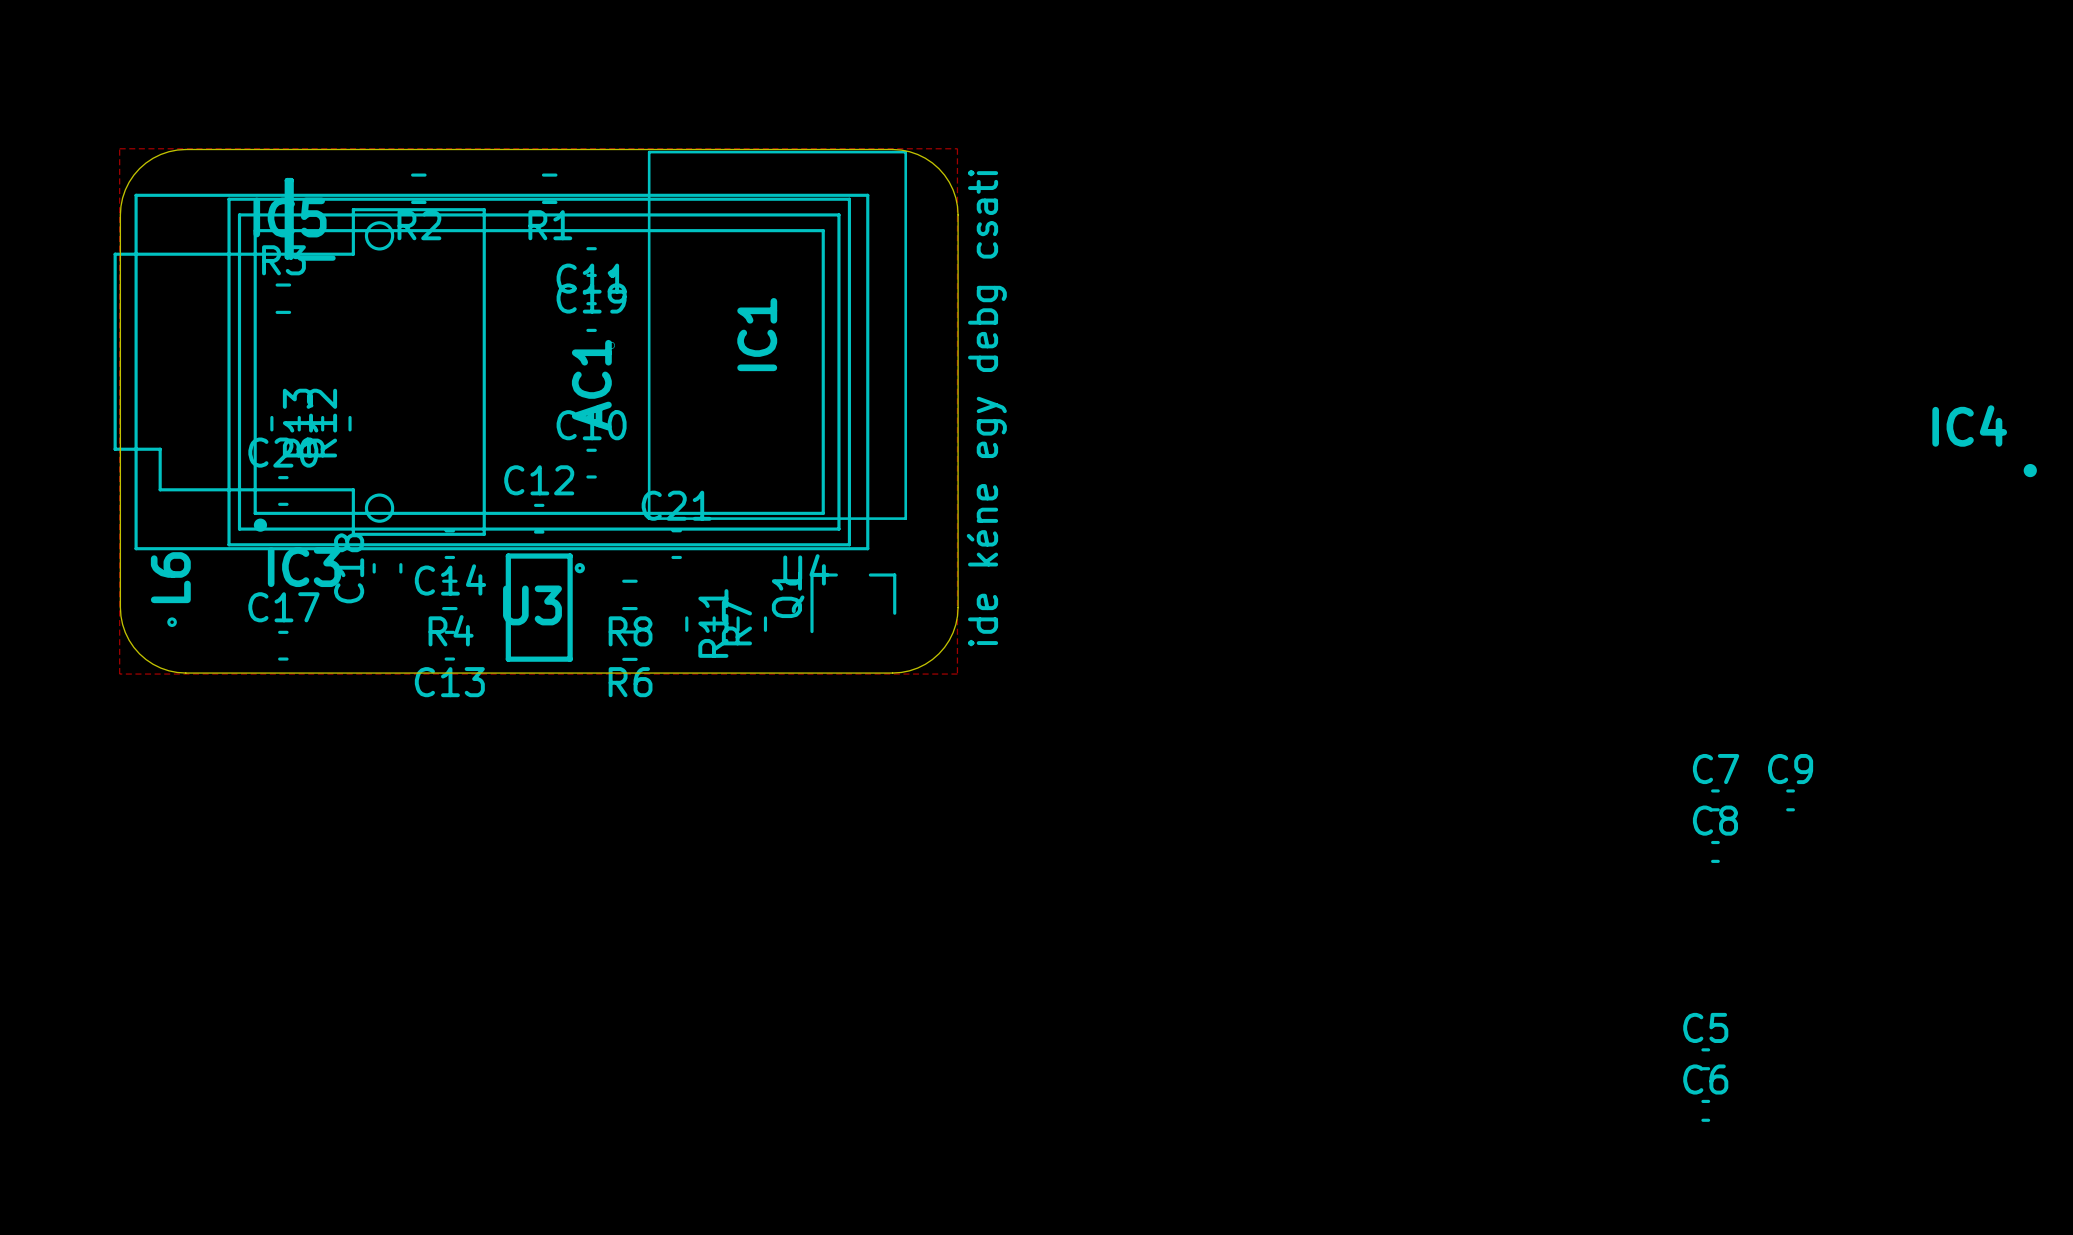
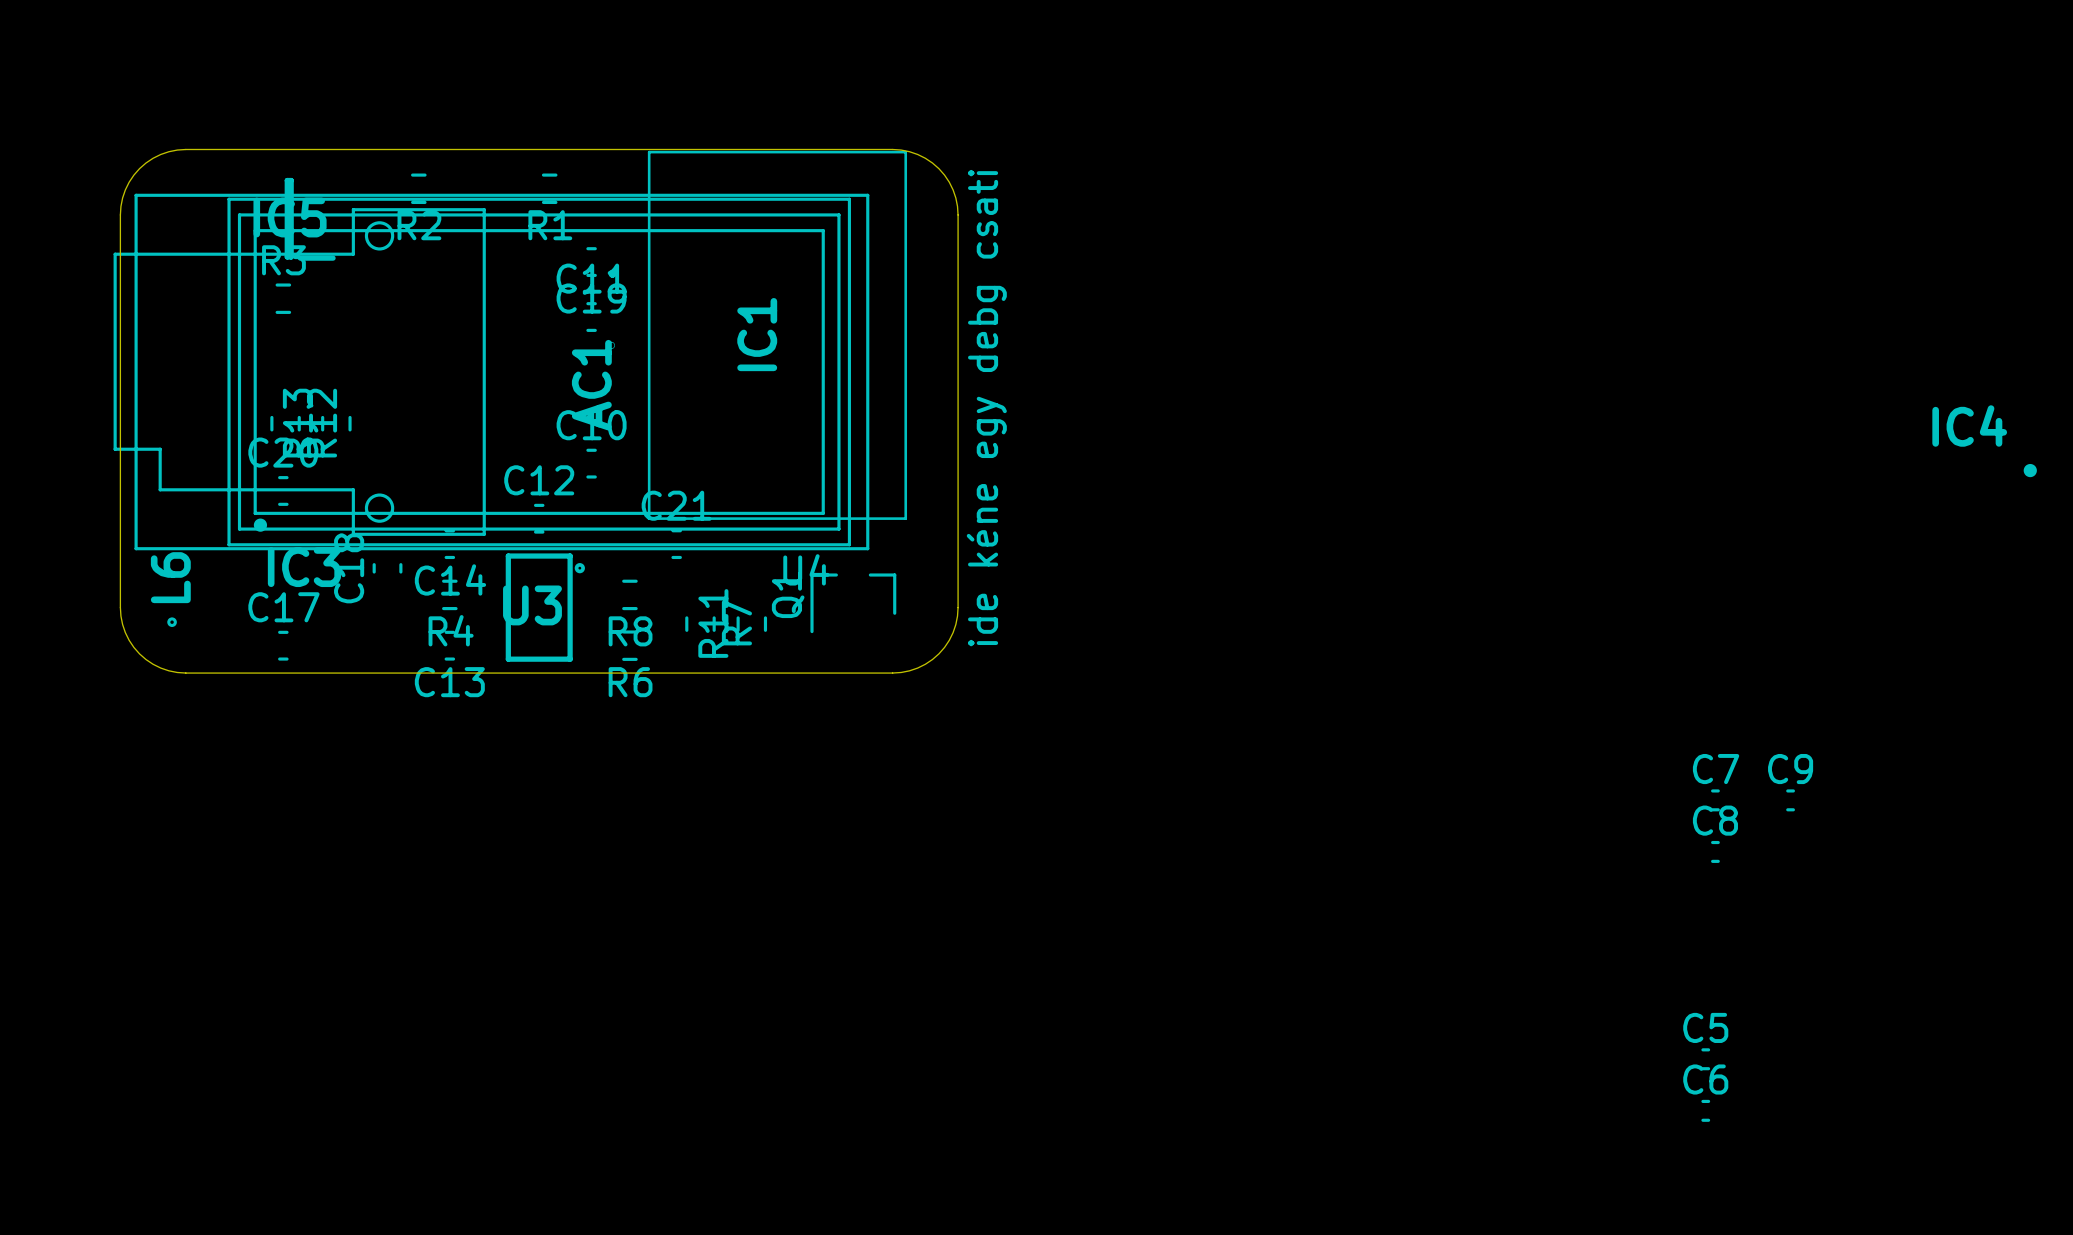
zone outline: (119, 148) (119, 674) (957, 674) (957, 148) (119, 148) -> none

